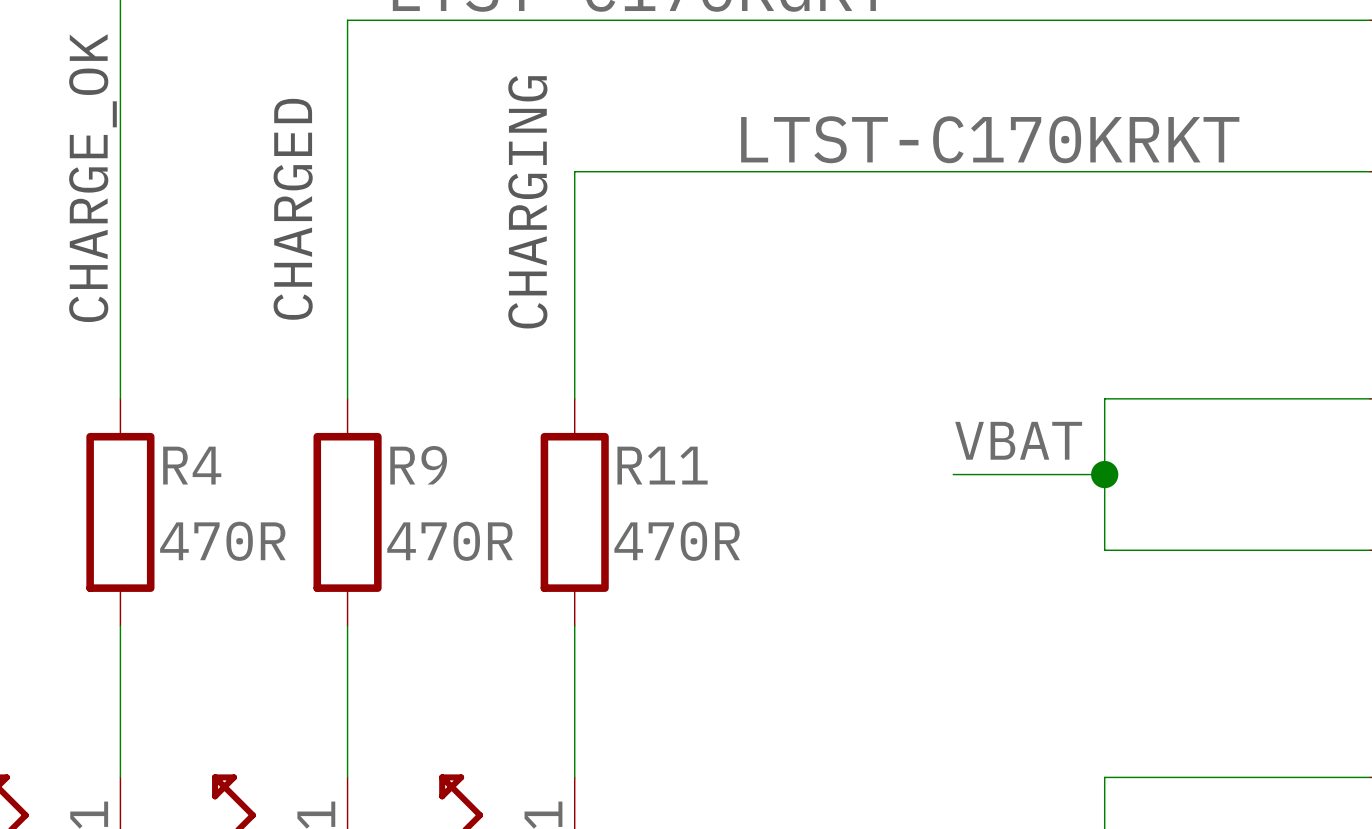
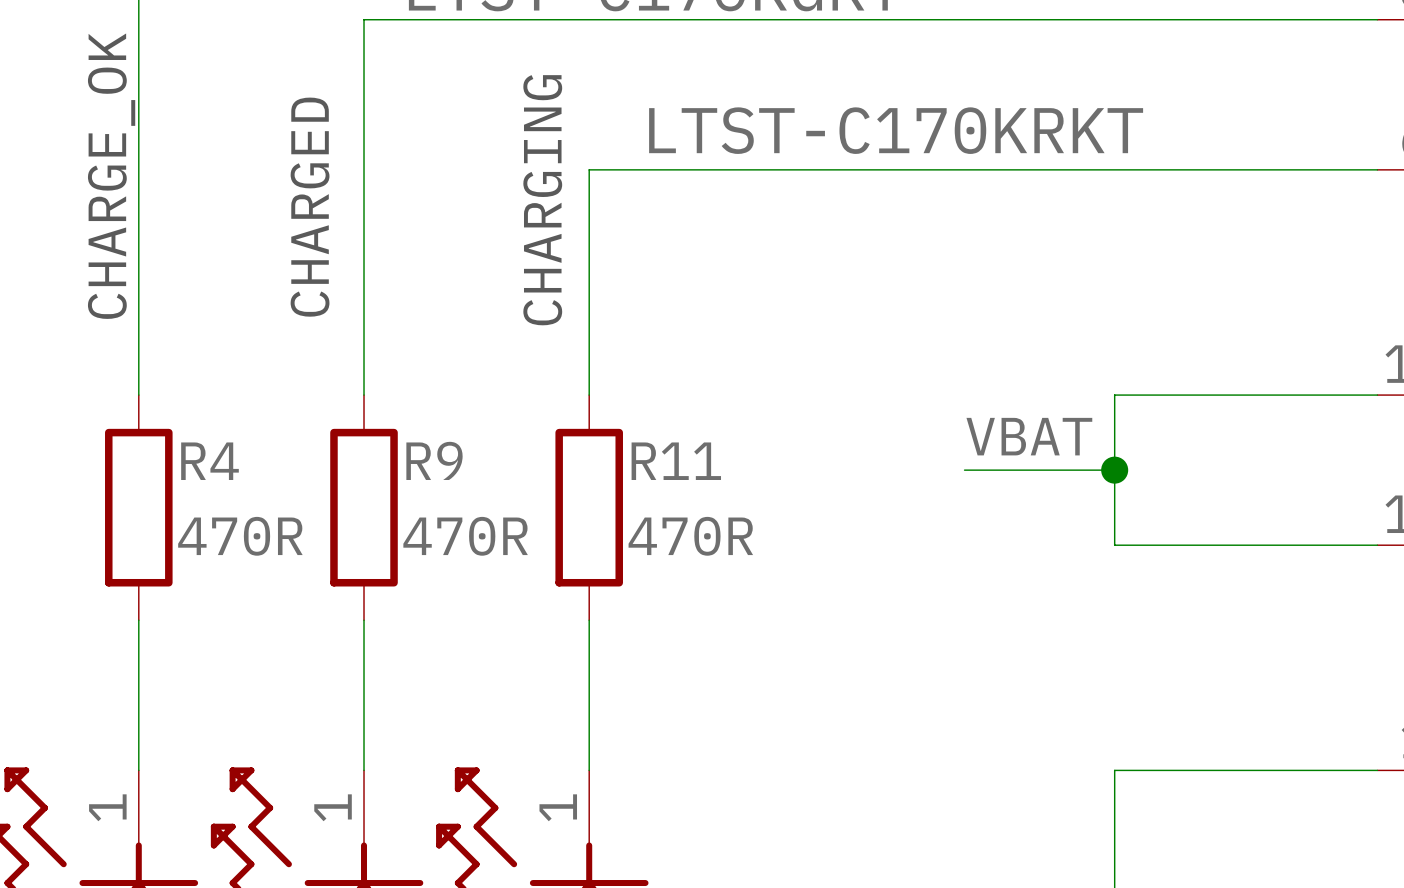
part value position: LTST-C170KRKT (990, 139) -> LTST-C170KRKT (896, 130)

